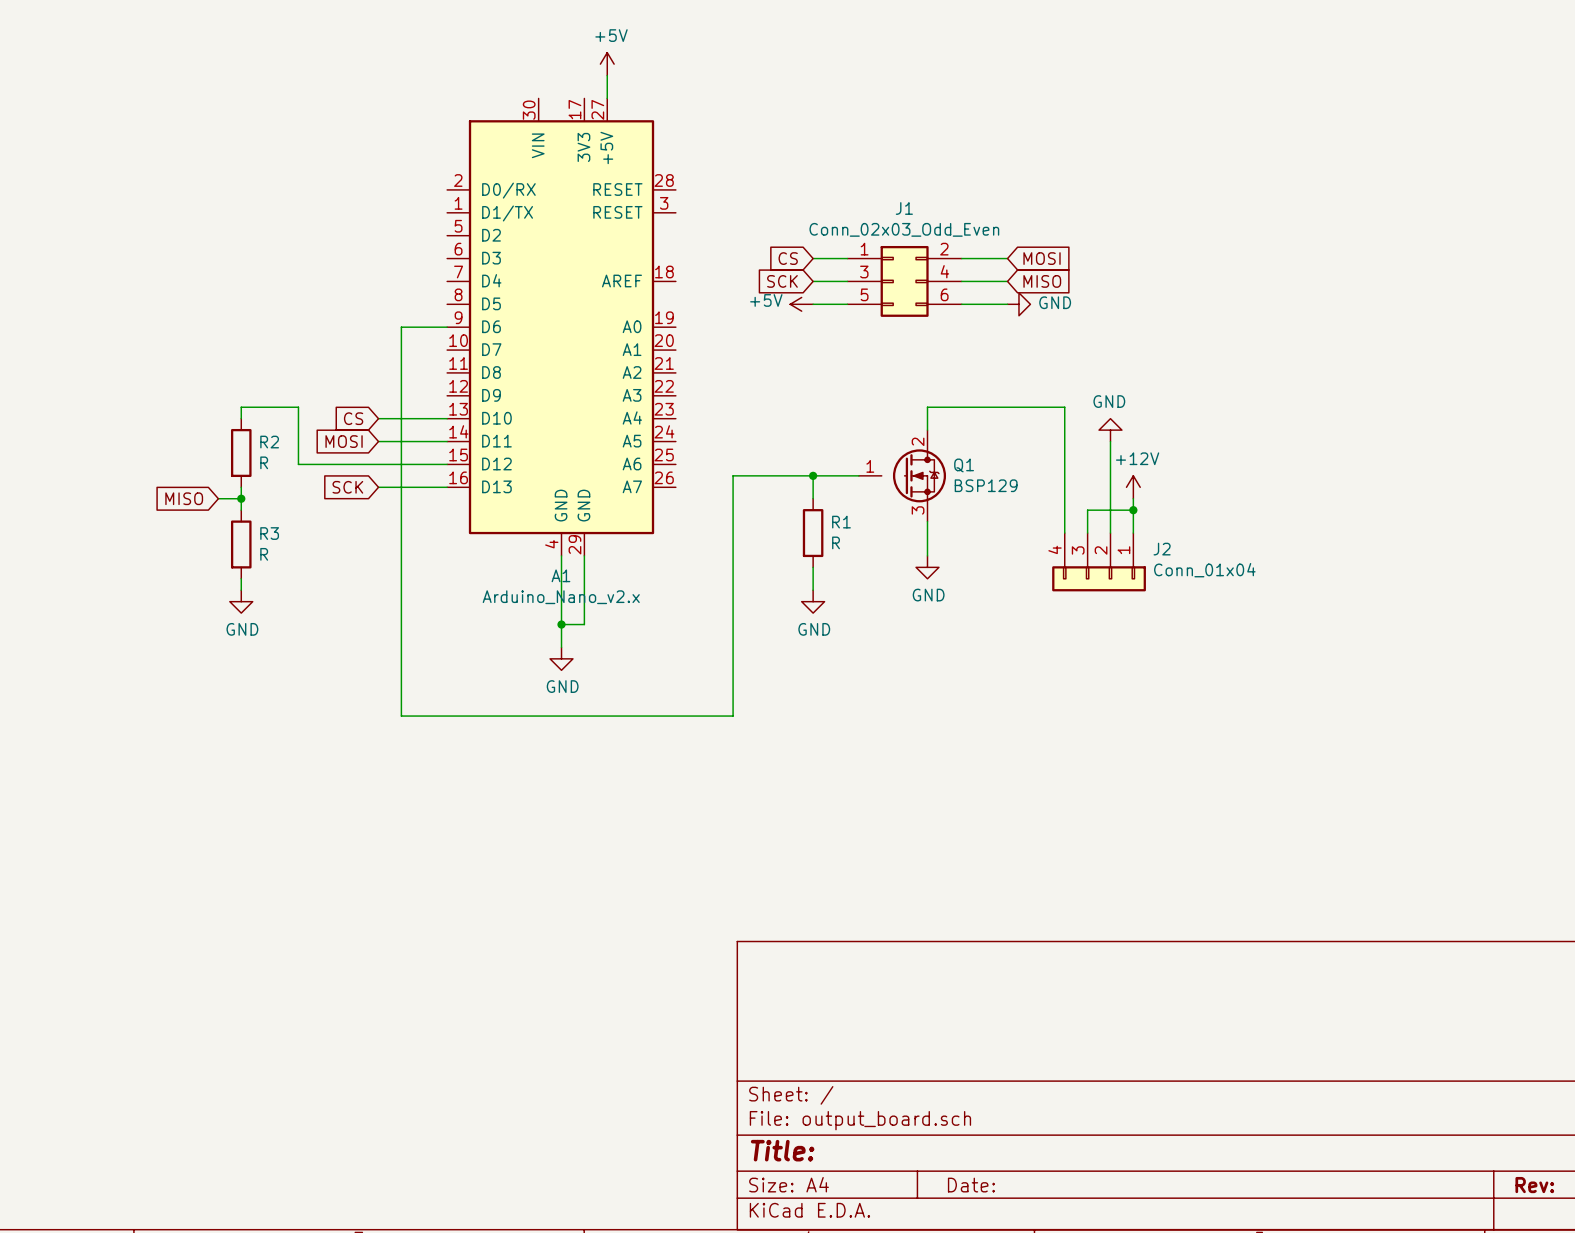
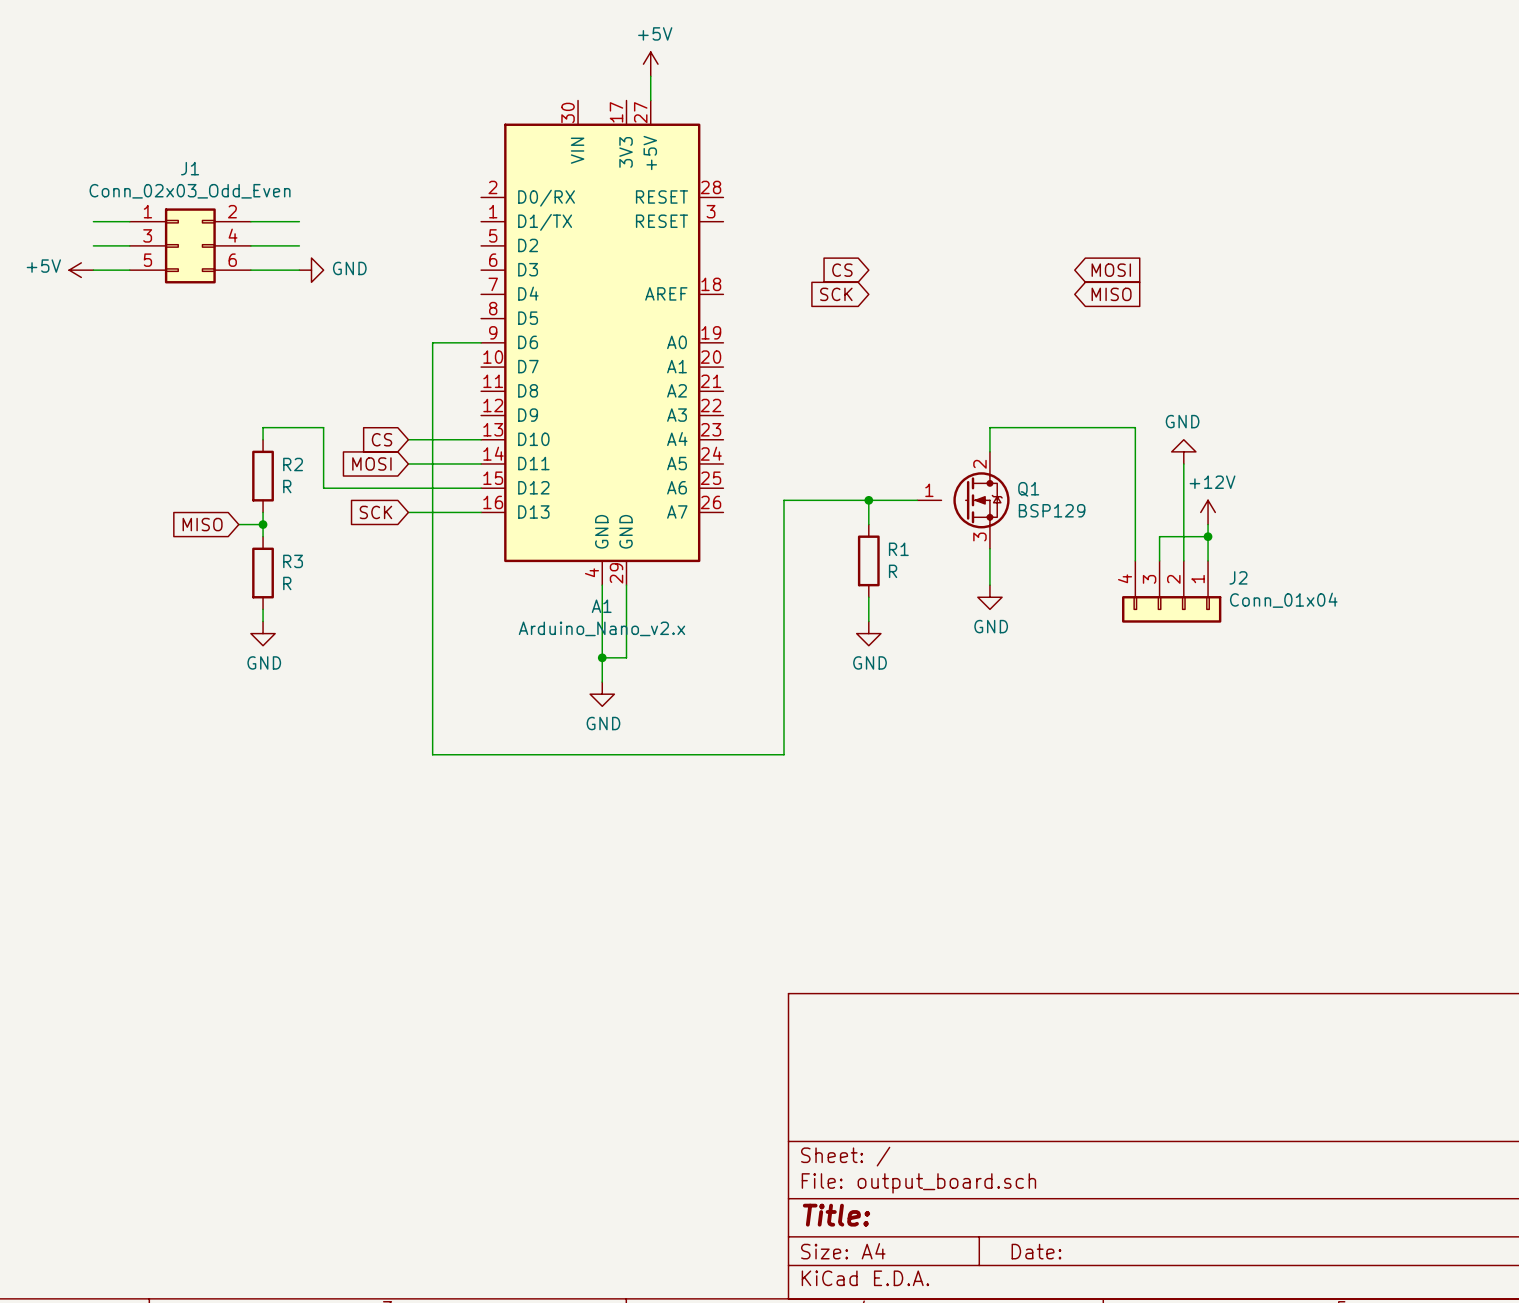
wire: none -> (93, 221) (129, 221)
wire: none -> (250, 221) (299, 221)
wire: none -> (93, 245) (129, 245)
wire: none -> (250, 245) (299, 245)
power symbol: none -> +5V (81, 270)
wire: none -> (93, 270) (129, 270)
wire: none -> (250, 270) (299, 270)
power symbol: none -> GND (311, 270)
wire: (813, 258) (847, 258) -> none
wire: (961, 258) (1007, 258) -> none
wire: (813, 281) (847, 281) -> none
J1 position: (904, 281) -> (190, 245)
wire: (961, 281) (1007, 281) -> none
power symbol: +5V (801, 304) -> none
wire: (813, 304) (847, 304) -> none
wire: (961, 304) (1007, 304) -> none
power symbol: GND (1018, 304) -> none

